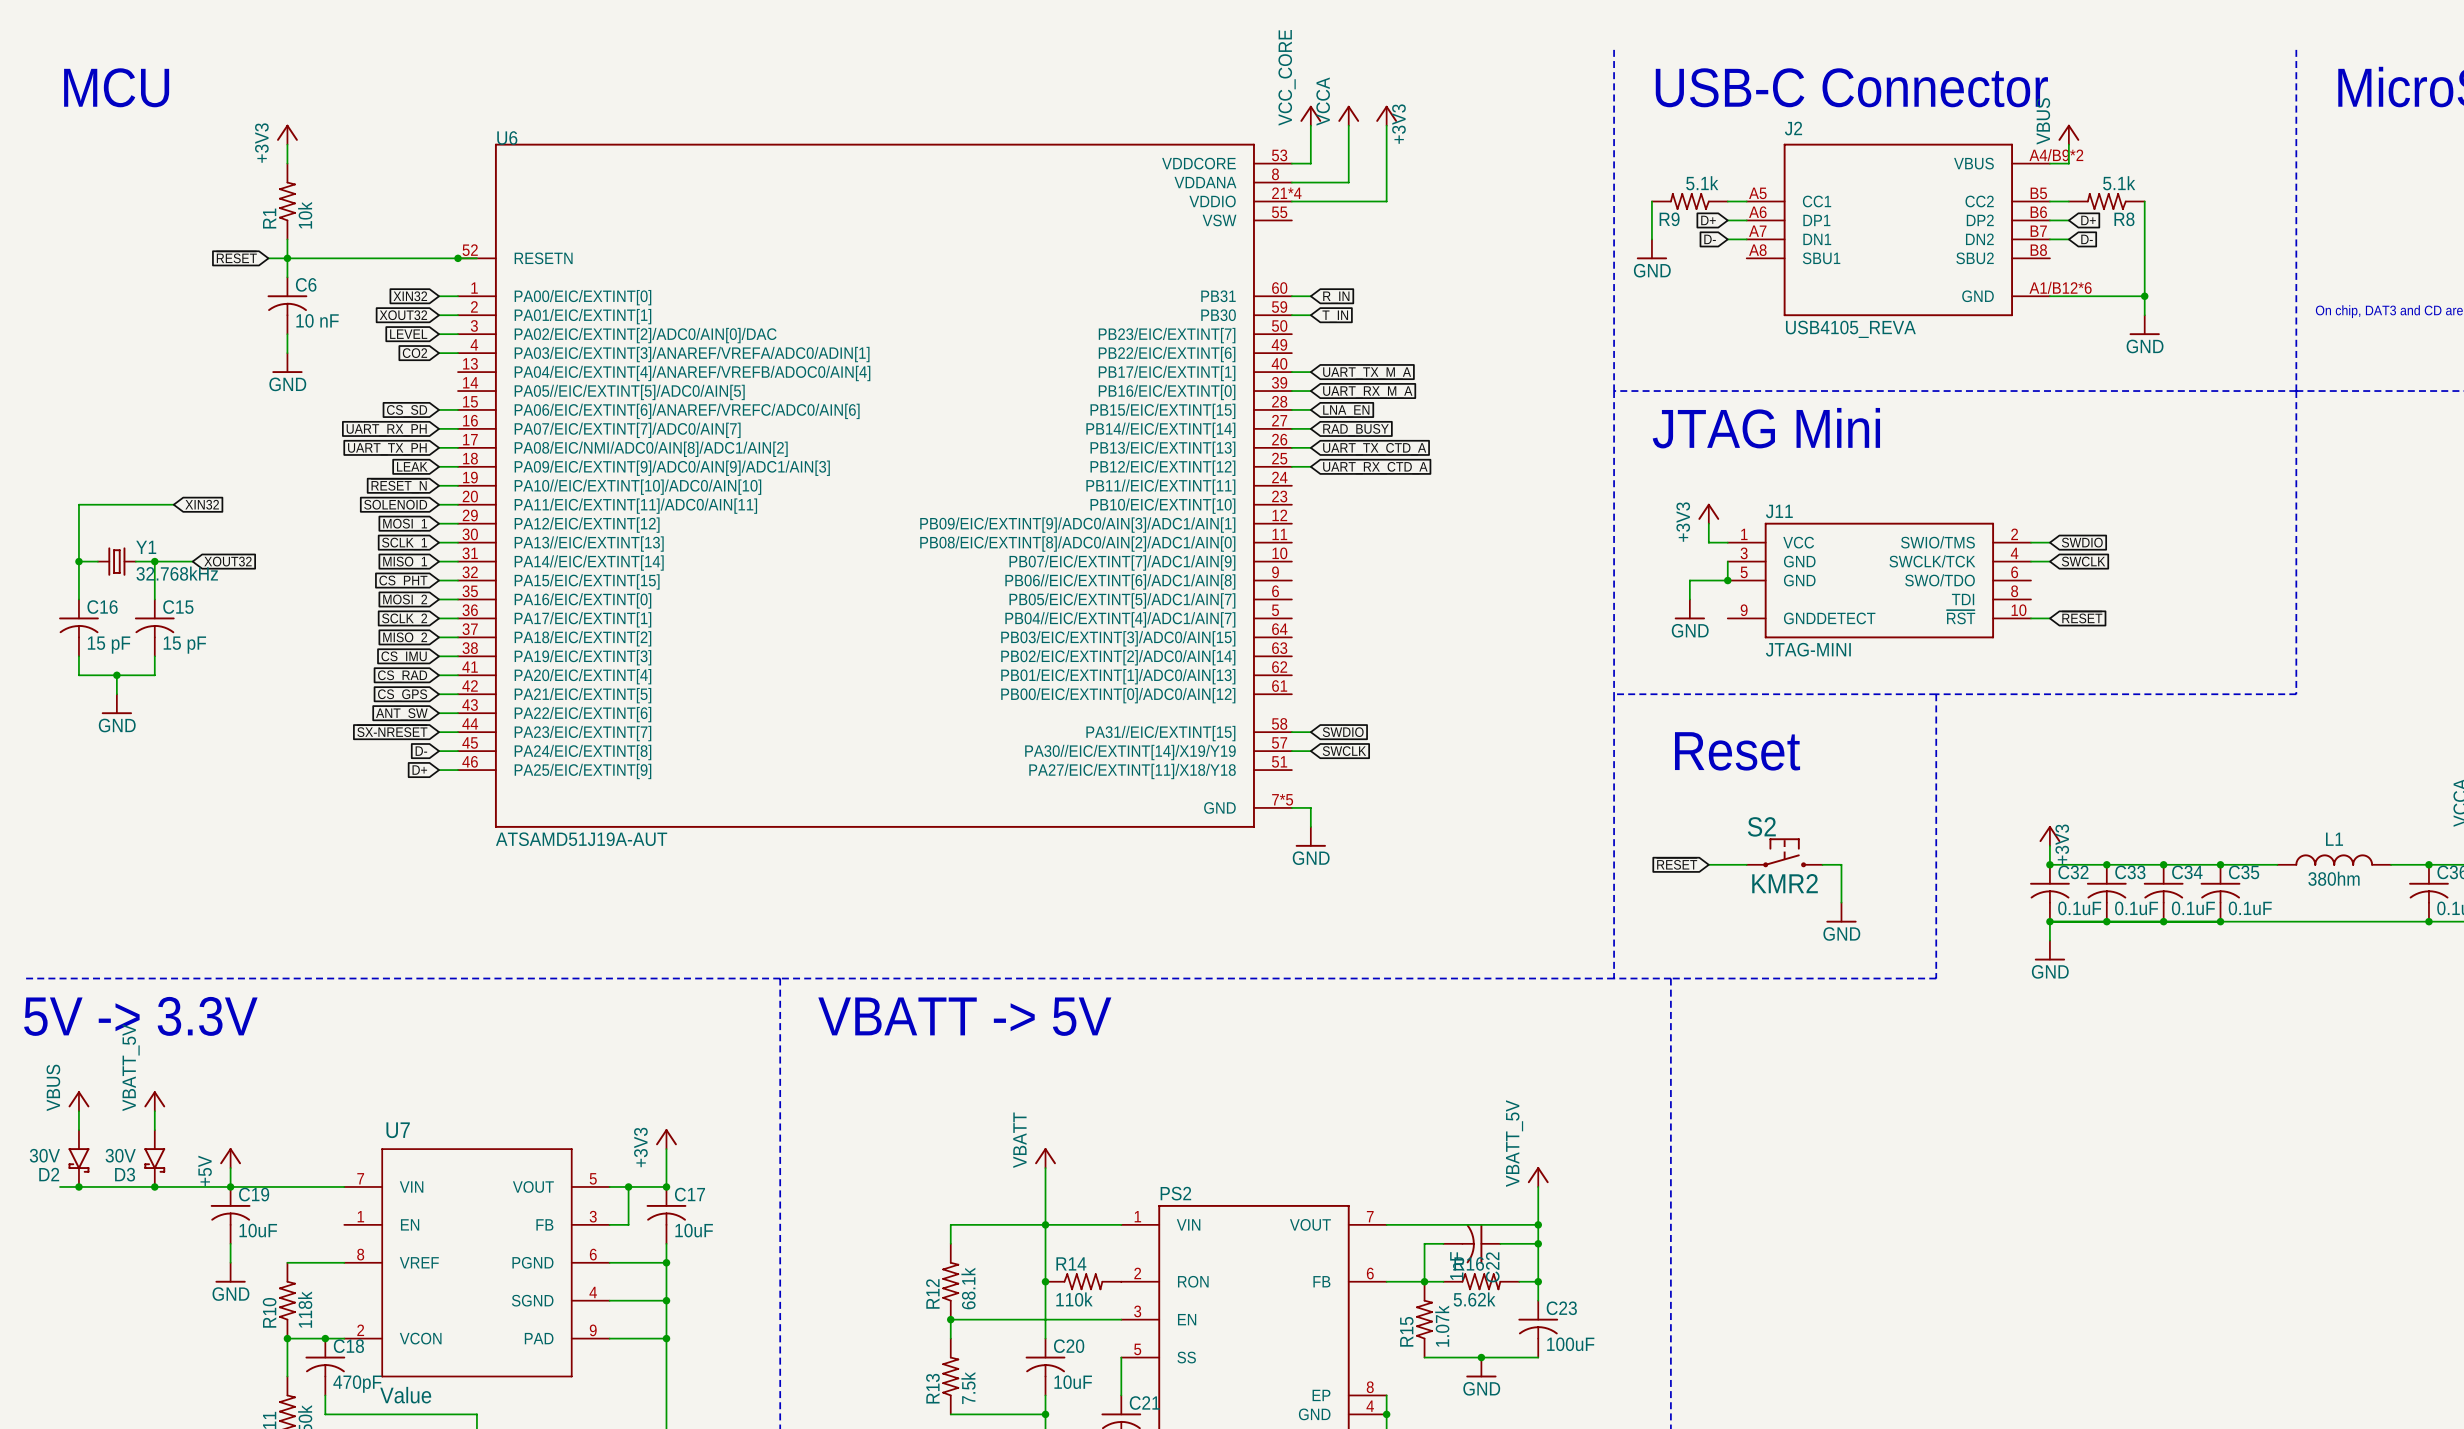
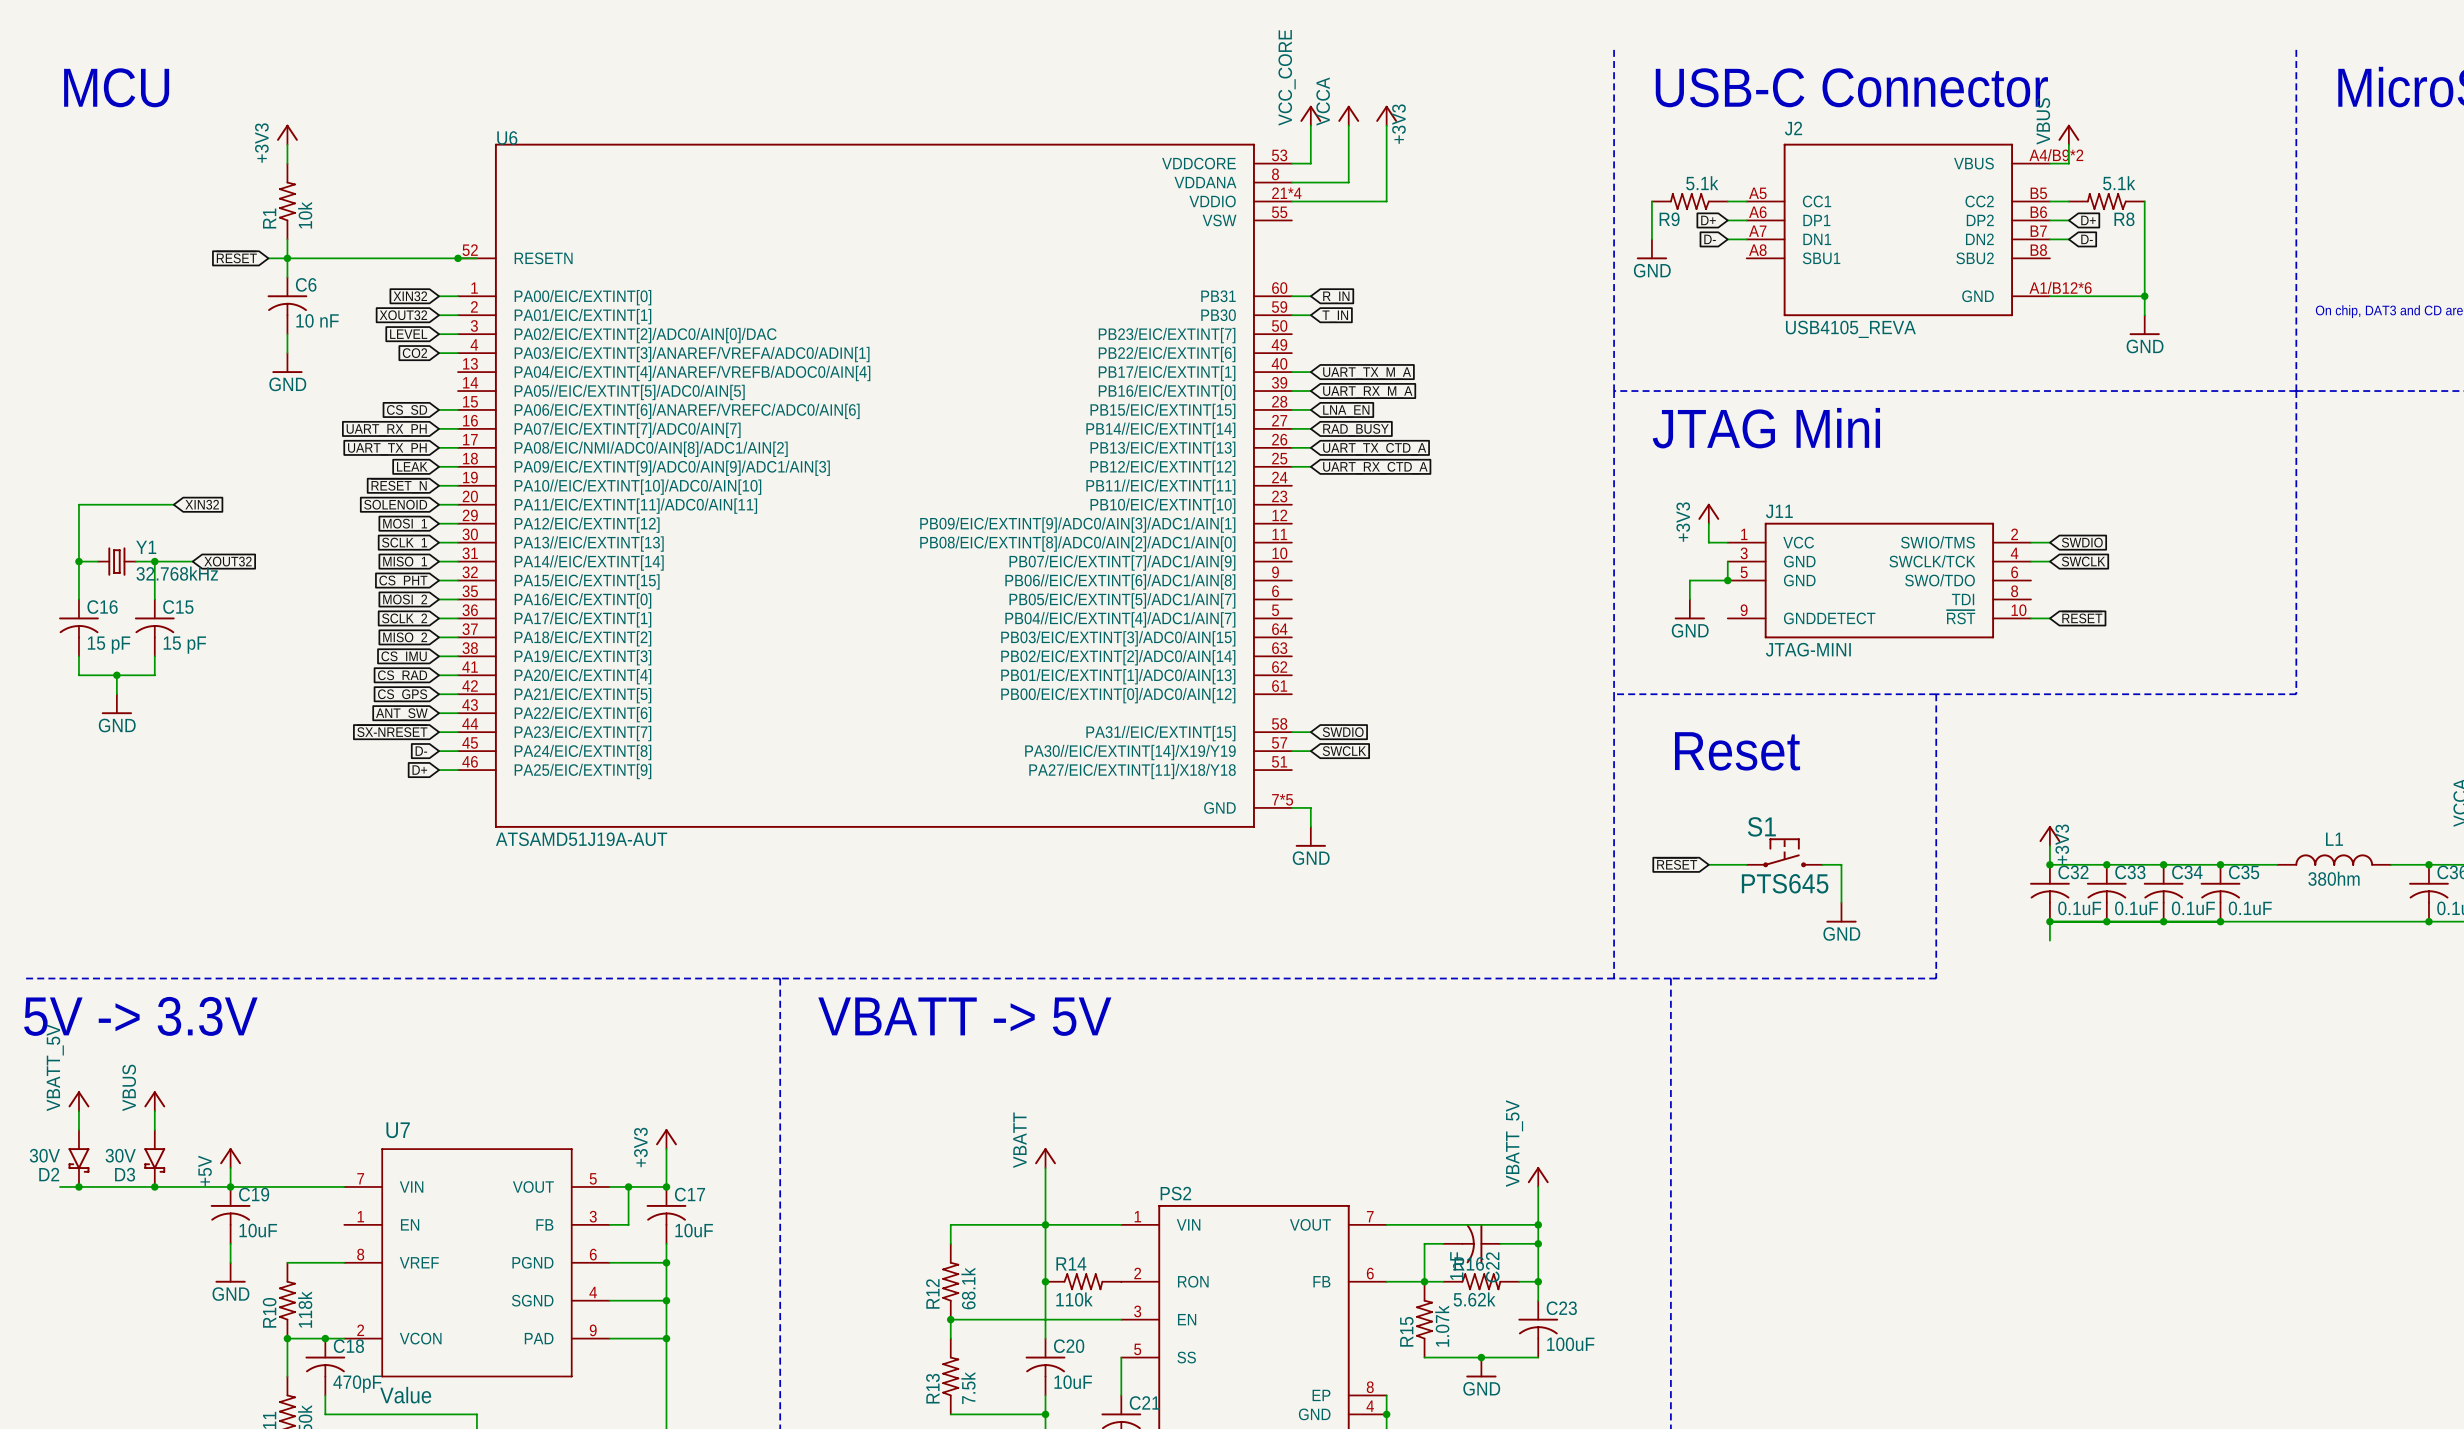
S2 name: S2 (1761, 826) -> S1 (1761, 826)
S2 value: KMR2 (1785, 883) -> PTS645 (1785, 883)
power symbol: GND (2049, 950) -> none
power symbol: VBUS (78, 1101) -> VBATT_5V (78, 1101)
power symbol: VBATT_5V (154, 1101) -> VBUS (154, 1101)

